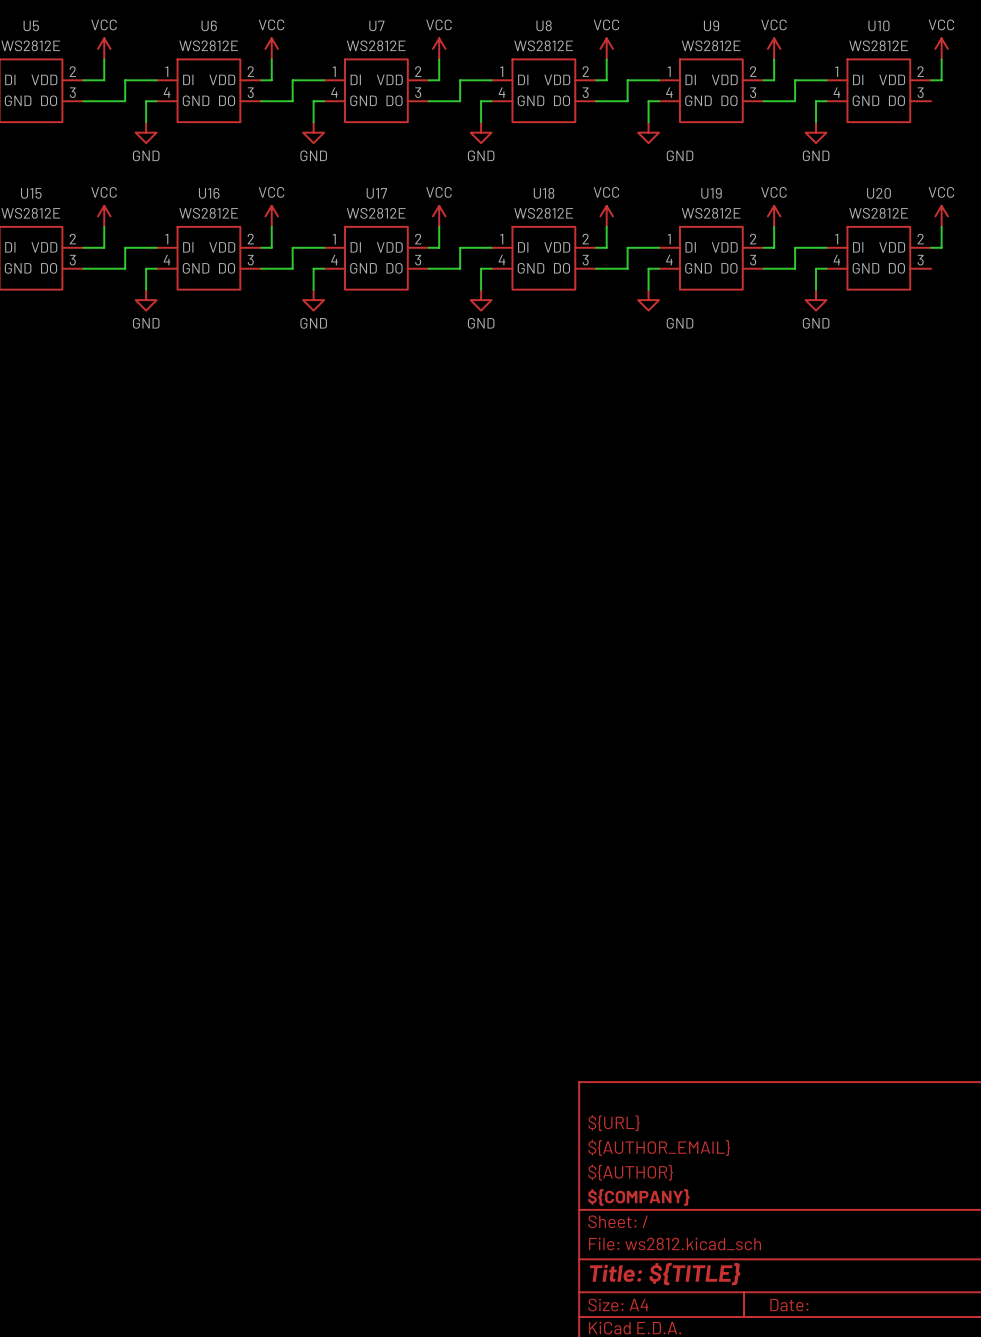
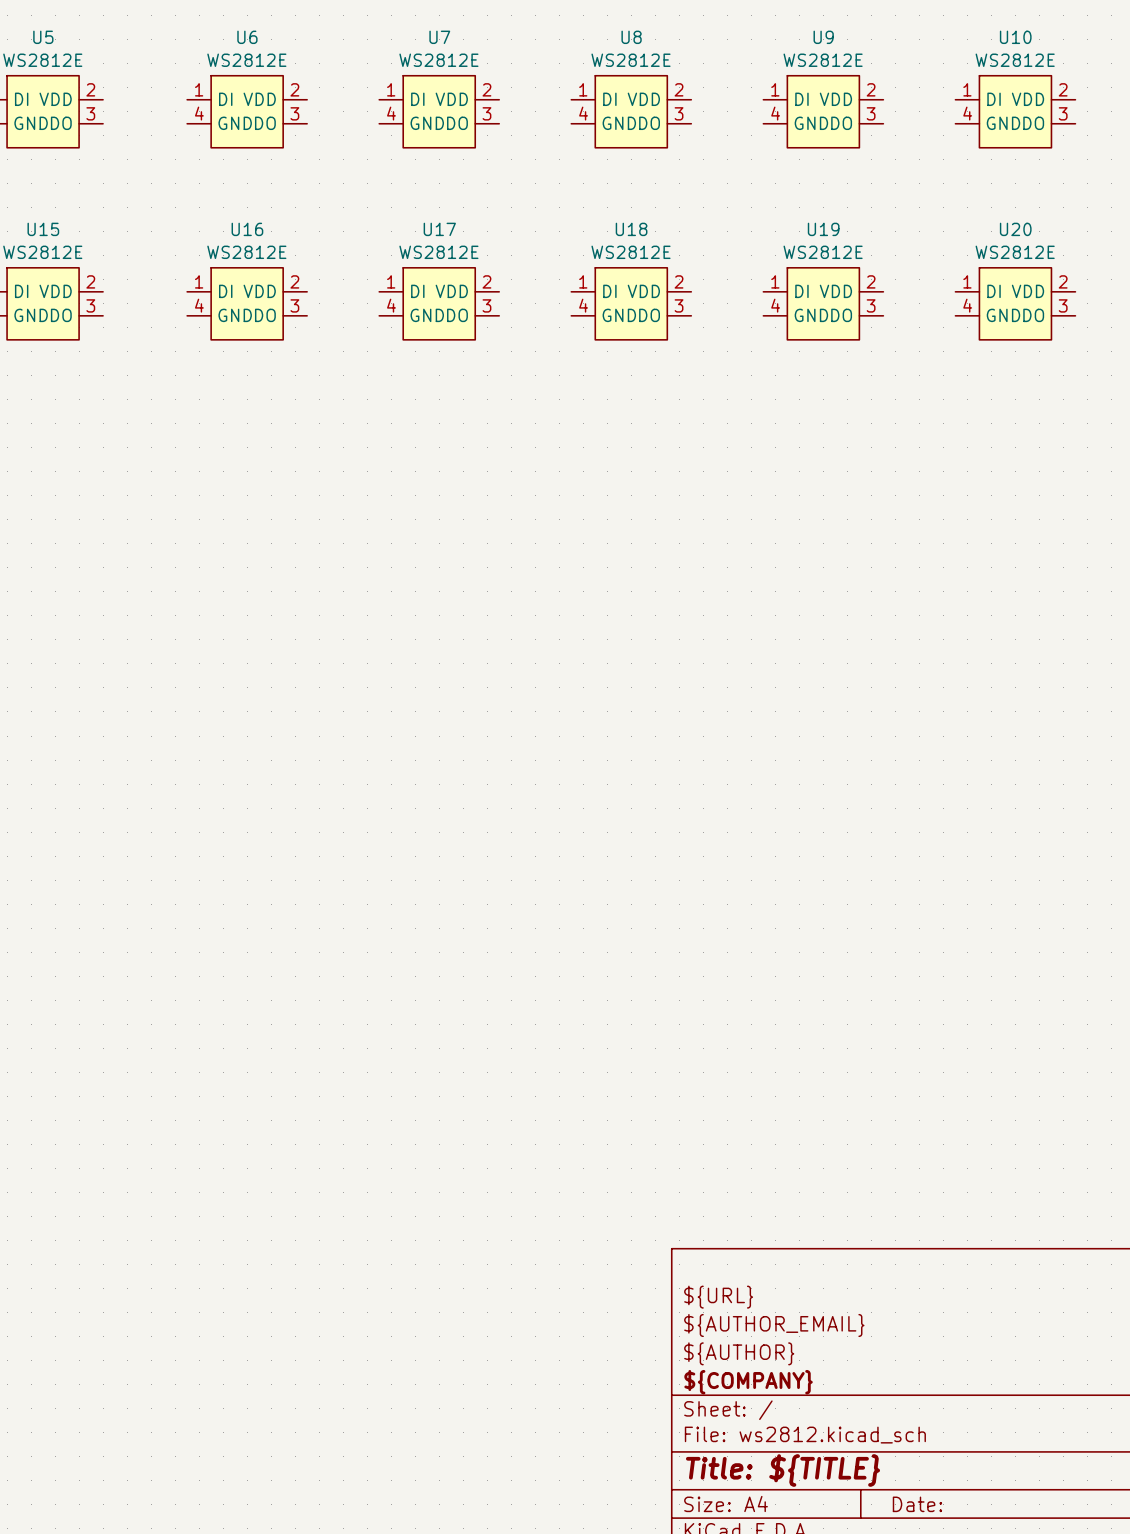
power symbol: VCC (104, 48) -> none
power symbol: VCC (271, 48) -> none
power symbol: VCC (439, 48) -> none
power symbol: VCC (606, 48) -> none
power symbol: VCC (774, 48) -> none
power symbol: VCC (941, 48) -> none
wire: (104, 59) (104, 80) (83, 80) -> none
wire: (271, 59) (271, 80) (261, 80) -> none
wire: (439, 59) (439, 80) (428, 80) -> none
wire: (606, 59) (606, 80) (596, 80) -> none
wire: (774, 59) (774, 80) (763, 80) -> none
wire: (941, 59) (941, 80) (931, 80) -> none
wire: (156, 80) (125, 80) (125, 101) (83, 101) -> none
wire: (324, 80) (292, 80) (292, 101) (261, 101) -> none
wire: (491, 80) (460, 80) (460, 101) (428, 101) -> none
wire: (659, 80) (627, 80) (627, 101) (596, 101) -> none
wire: (826, 80) (795, 80) (795, 101) (763, 101) -> none
wire: (156, 101) (146, 101) (146, 122) -> none
wire: (324, 101) (313, 101) (313, 122) -> none
wire: (491, 101) (481, 101) (481, 122) -> none
wire: (659, 101) (648, 101) (648, 122) -> none
wire: (826, 101) (816, 101) (816, 122) -> none
power symbol: GND (146, 132) -> none
power symbol: GND (313, 132) -> none
power symbol: GND (481, 132) -> none
power symbol: GND (648, 132) -> none
power symbol: GND (816, 132) -> none
power symbol: VCC (104, 216) -> none
power symbol: VCC (271, 216) -> none
power symbol: VCC (439, 216) -> none
power symbol: VCC (606, 216) -> none
power symbol: VCC (774, 216) -> none
power symbol: VCC (941, 216) -> none
wire: (104, 226) (104, 247) (83, 247) -> none
wire: (271, 226) (271, 247) (261, 247) -> none
wire: (439, 226) (439, 247) (428, 247) -> none
wire: (606, 226) (606, 247) (596, 247) -> none
wire: (774, 226) (774, 247) (763, 247) -> none
wire: (941, 226) (941, 247) (931, 247) -> none
wire: (156, 247) (125, 247) (125, 268) (83, 268) -> none
wire: (324, 247) (292, 247) (292, 268) (261, 268) -> none
wire: (491, 247) (460, 247) (460, 268) (428, 268) -> none
wire: (659, 247) (627, 247) (627, 268) (596, 268) -> none
wire: (826, 247) (795, 247) (795, 268) (763, 268) -> none
wire: (156, 268) (146, 268) (146, 289) -> none
wire: (324, 268) (313, 268) (313, 289) -> none
wire: (491, 268) (481, 268) (481, 289) -> none
wire: (659, 268) (648, 268) (648, 289) -> none
wire: (826, 268) (816, 268) (816, 289) -> none
power symbol: GND (146, 300) -> none
power symbol: GND (313, 300) -> none
power symbol: GND (481, 300) -> none
power symbol: GND (648, 300) -> none
power symbol: GND (816, 300) -> none

